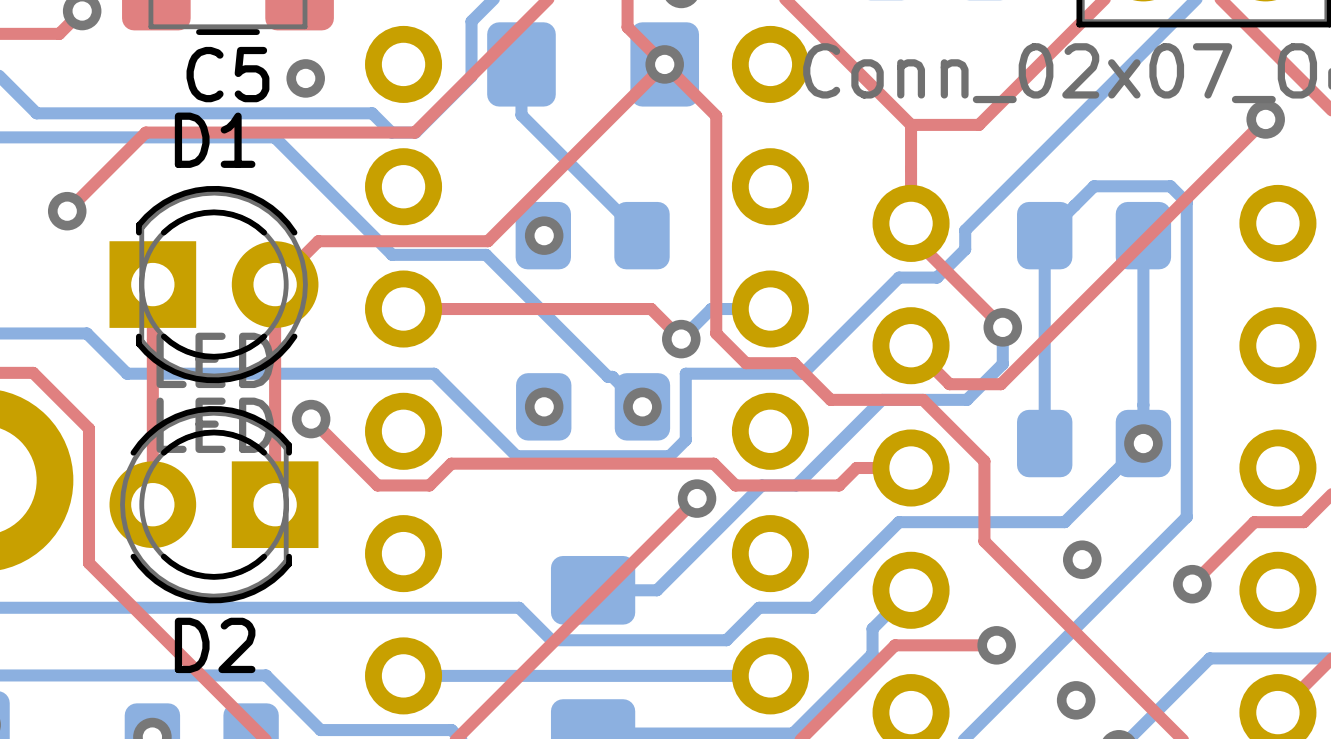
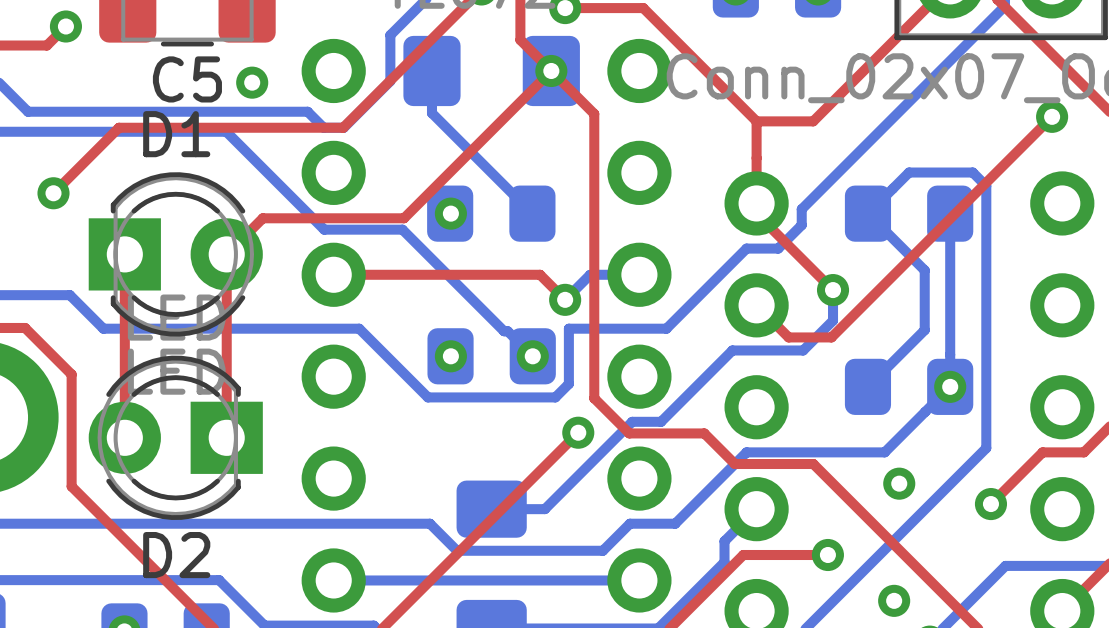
bottom track: (1044, 235) (1044, 443) -> (867, 213) (924, 270) (924, 330) (867, 386)
top track: (716, 333) (745, 363) (794, 363) (830, 399) (923, 399) (984, 461) (984, 541) -> (594, 295) (594, 398) (629, 433) (704, 433) (734, 464) (813, 464) (817, 468)
top track: (311, 419) (377, 485) (429, 485) (451, 463) (713, 463) (735, 485) (839, 485) (856, 468) (911, 468) -> none
via: (311, 419) -> none

